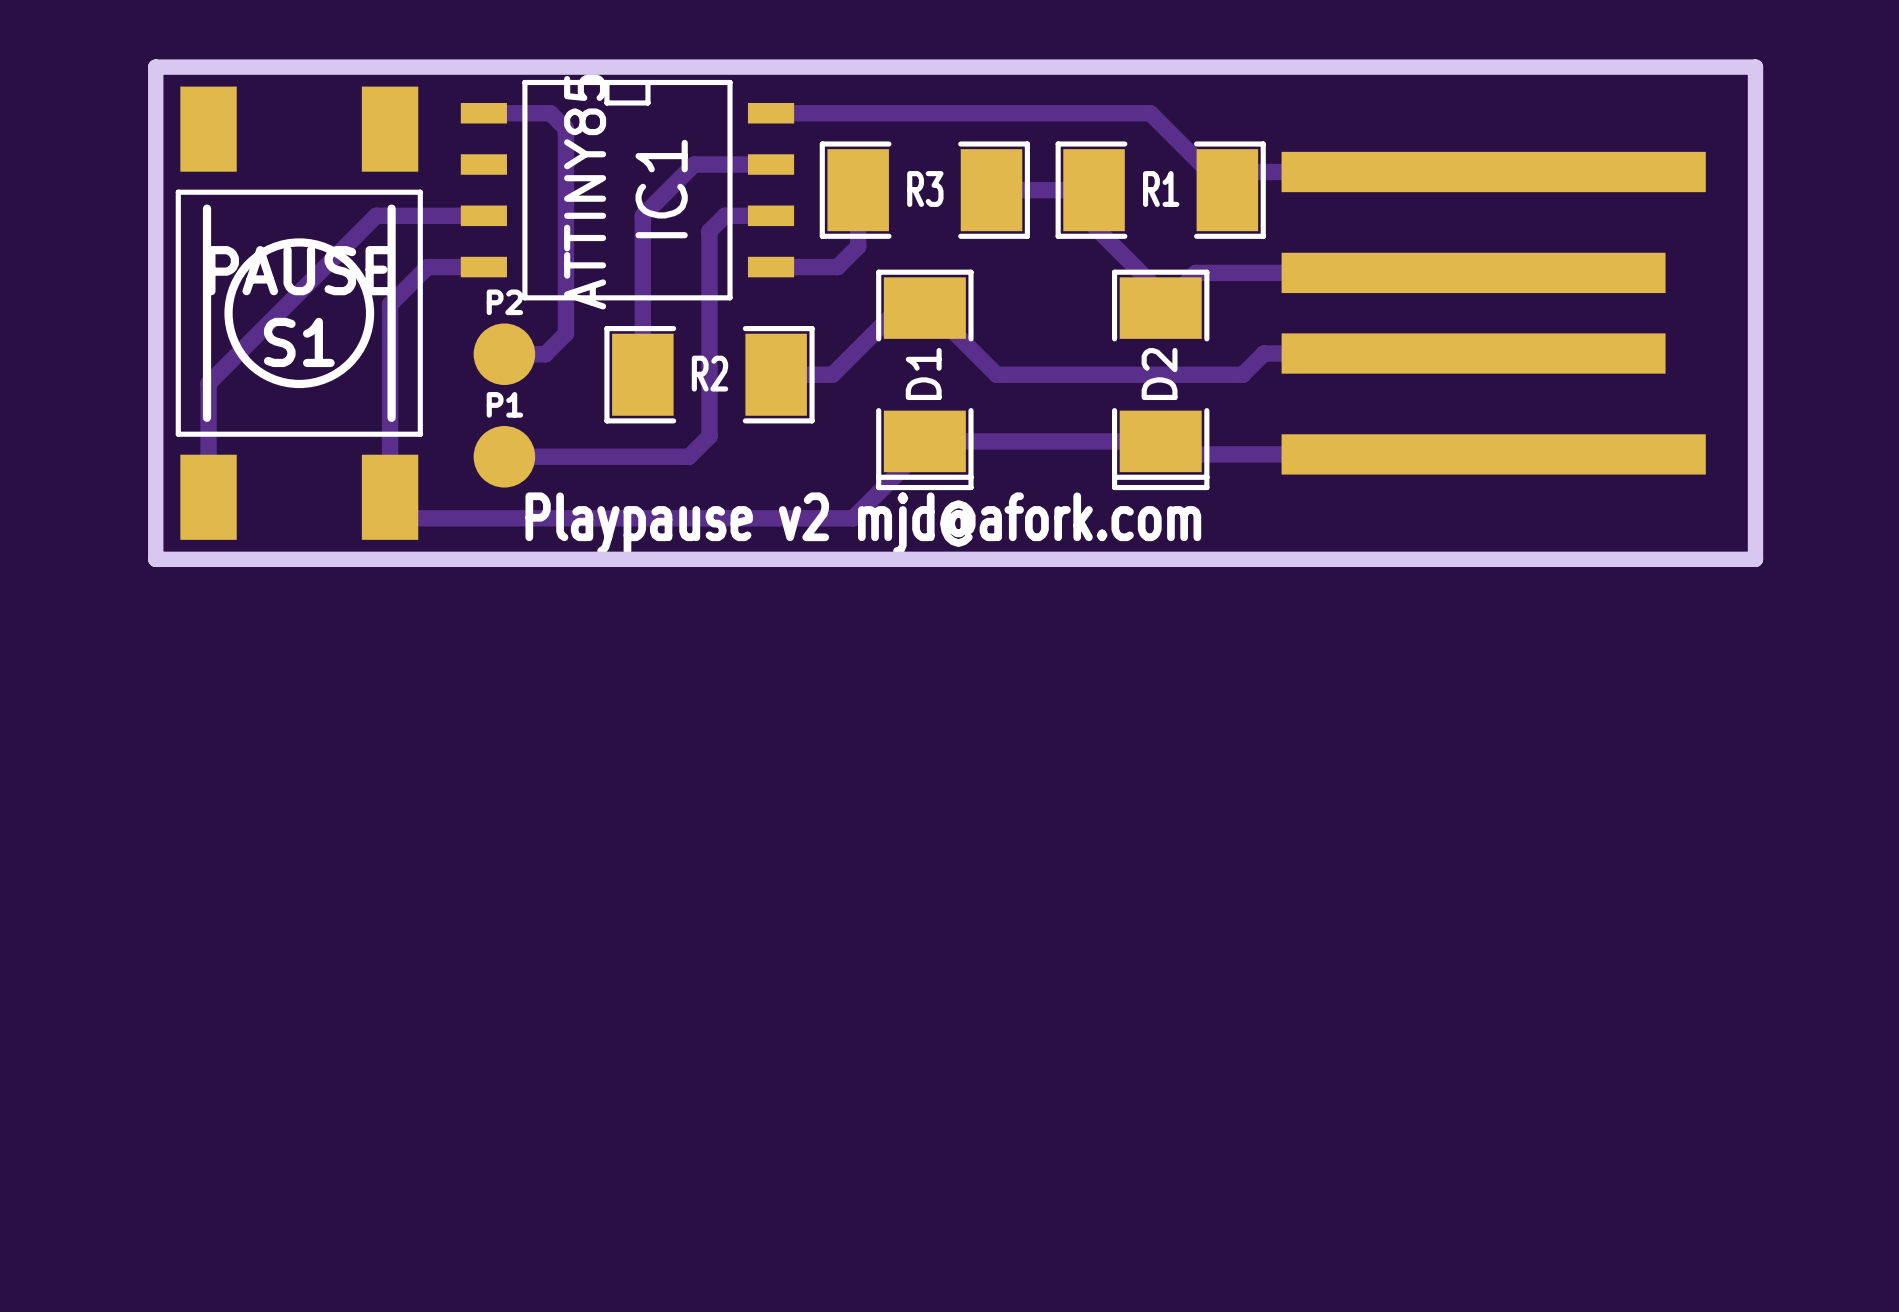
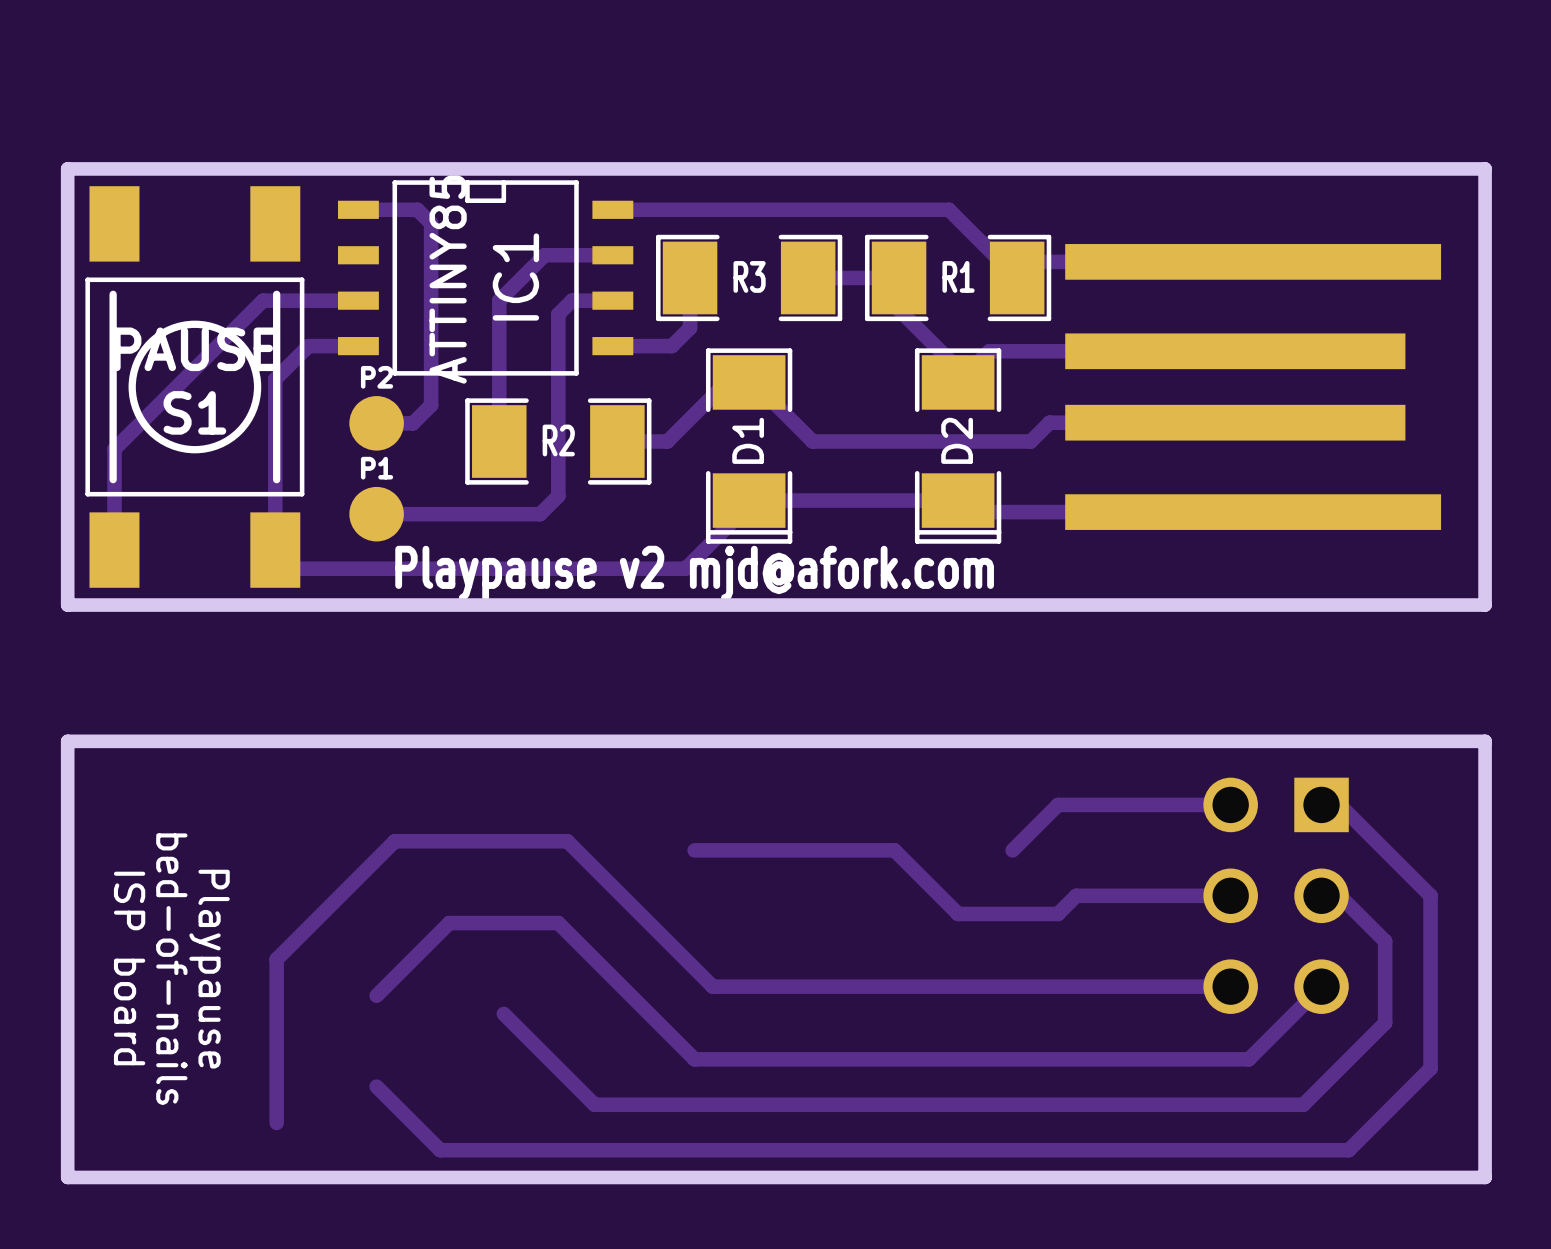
board edge: none -> (67, 741) (67, 1177) (1485, 1177) (1485, 741) (67, 741)
track: none -> (1230, 804) (1058, 804) (1012, 850)
track: none -> (1321, 804) (1339, 804) (1430, 895) (1430, 1068) (1348, 1150) (440, 1150) (376, 1086)
track: none -> (694, 850) (894, 850) (958, 913) (1058, 913) (1076, 895) (1230, 895)
part: none -> (1276, 895)
track: none -> (1321, 895) (1339, 895) (1385, 941) (1385, 1023) (1303, 1104) (594, 1104) (503, 1013)
text: none -> ISP board (129, 968)
text: none -> bed-of-nails (171, 969)
text: none -> Playpause (209, 969)
track: none -> (1230, 986) (712, 986) (567, 841) (394, 841) (276, 959) (276, 1122)
track: none -> (1321, 986) (1248, 1059) (694, 1059) (558, 923) (449, 923) (376, 995)

